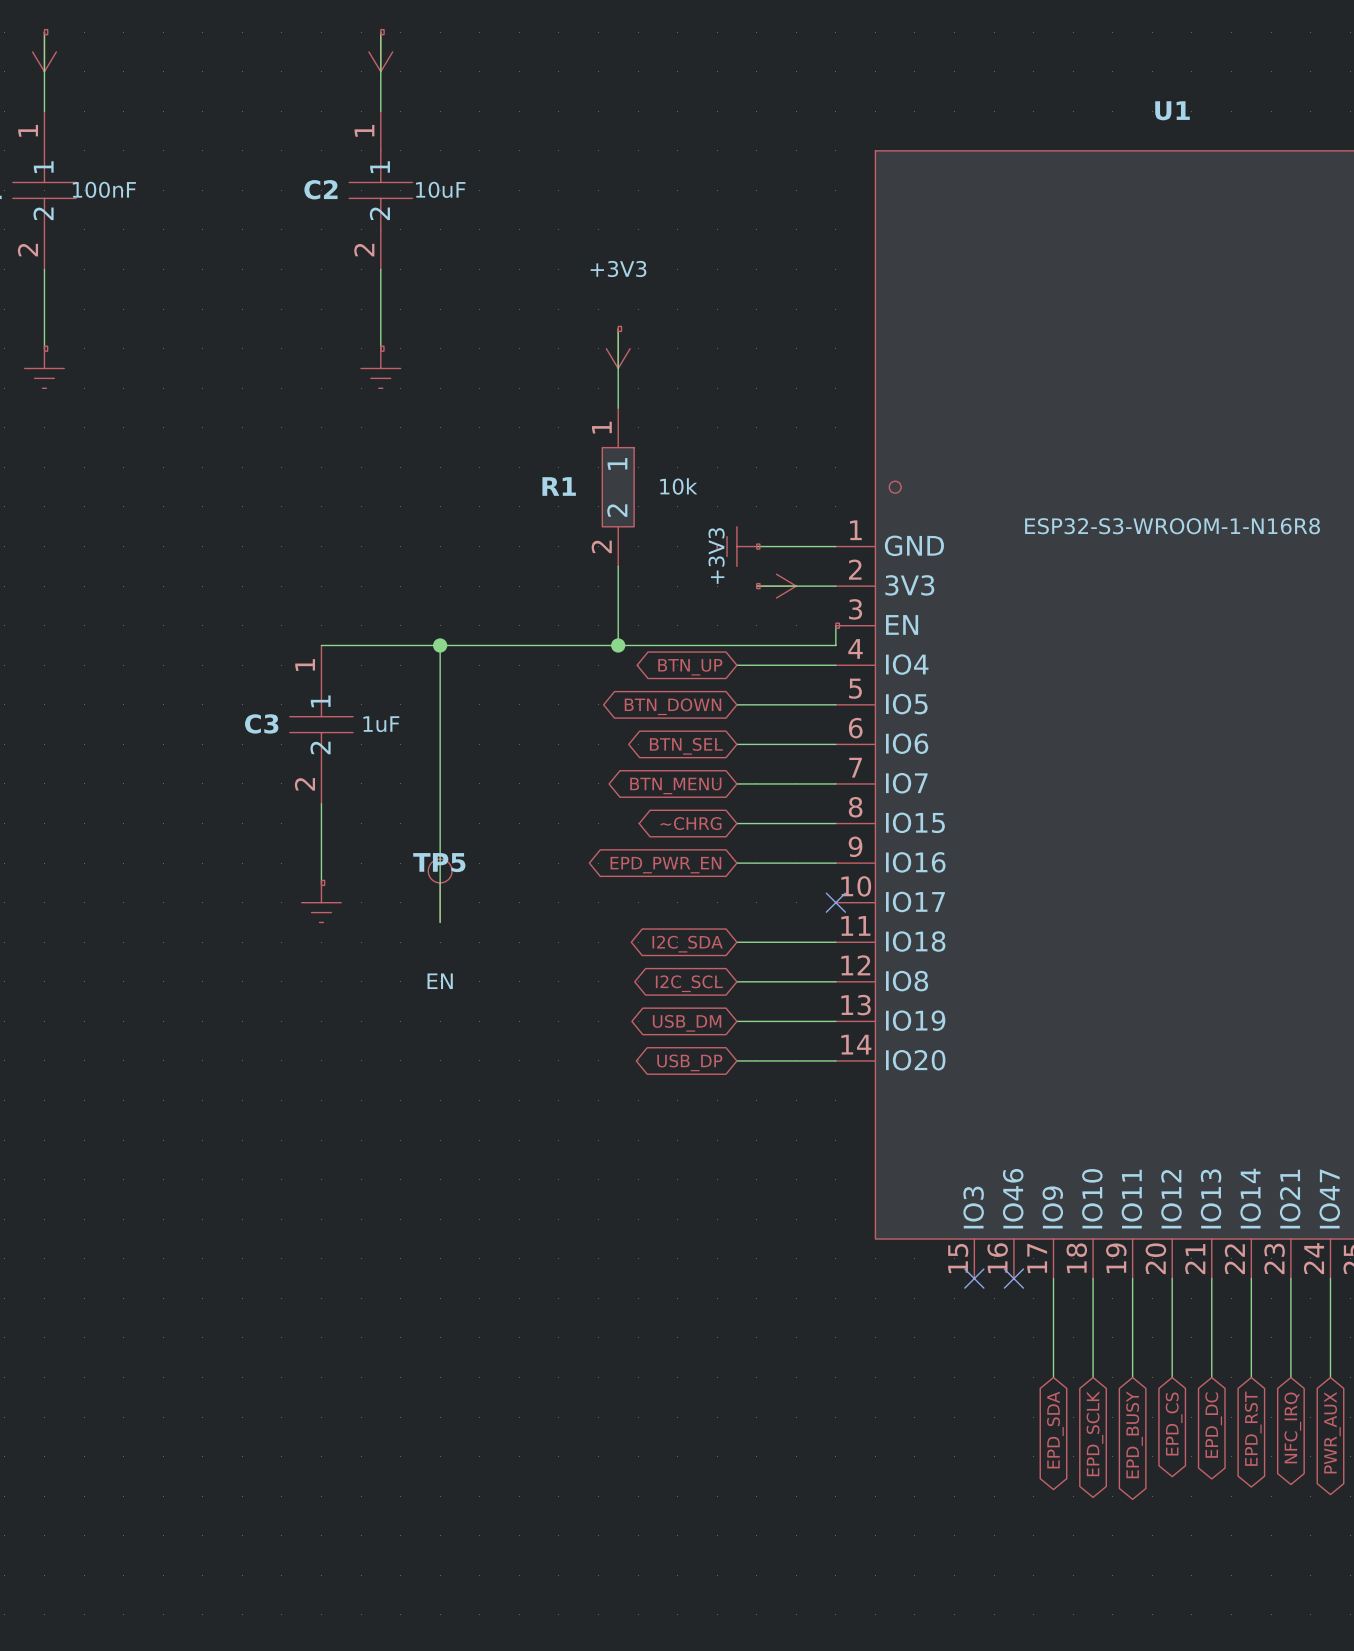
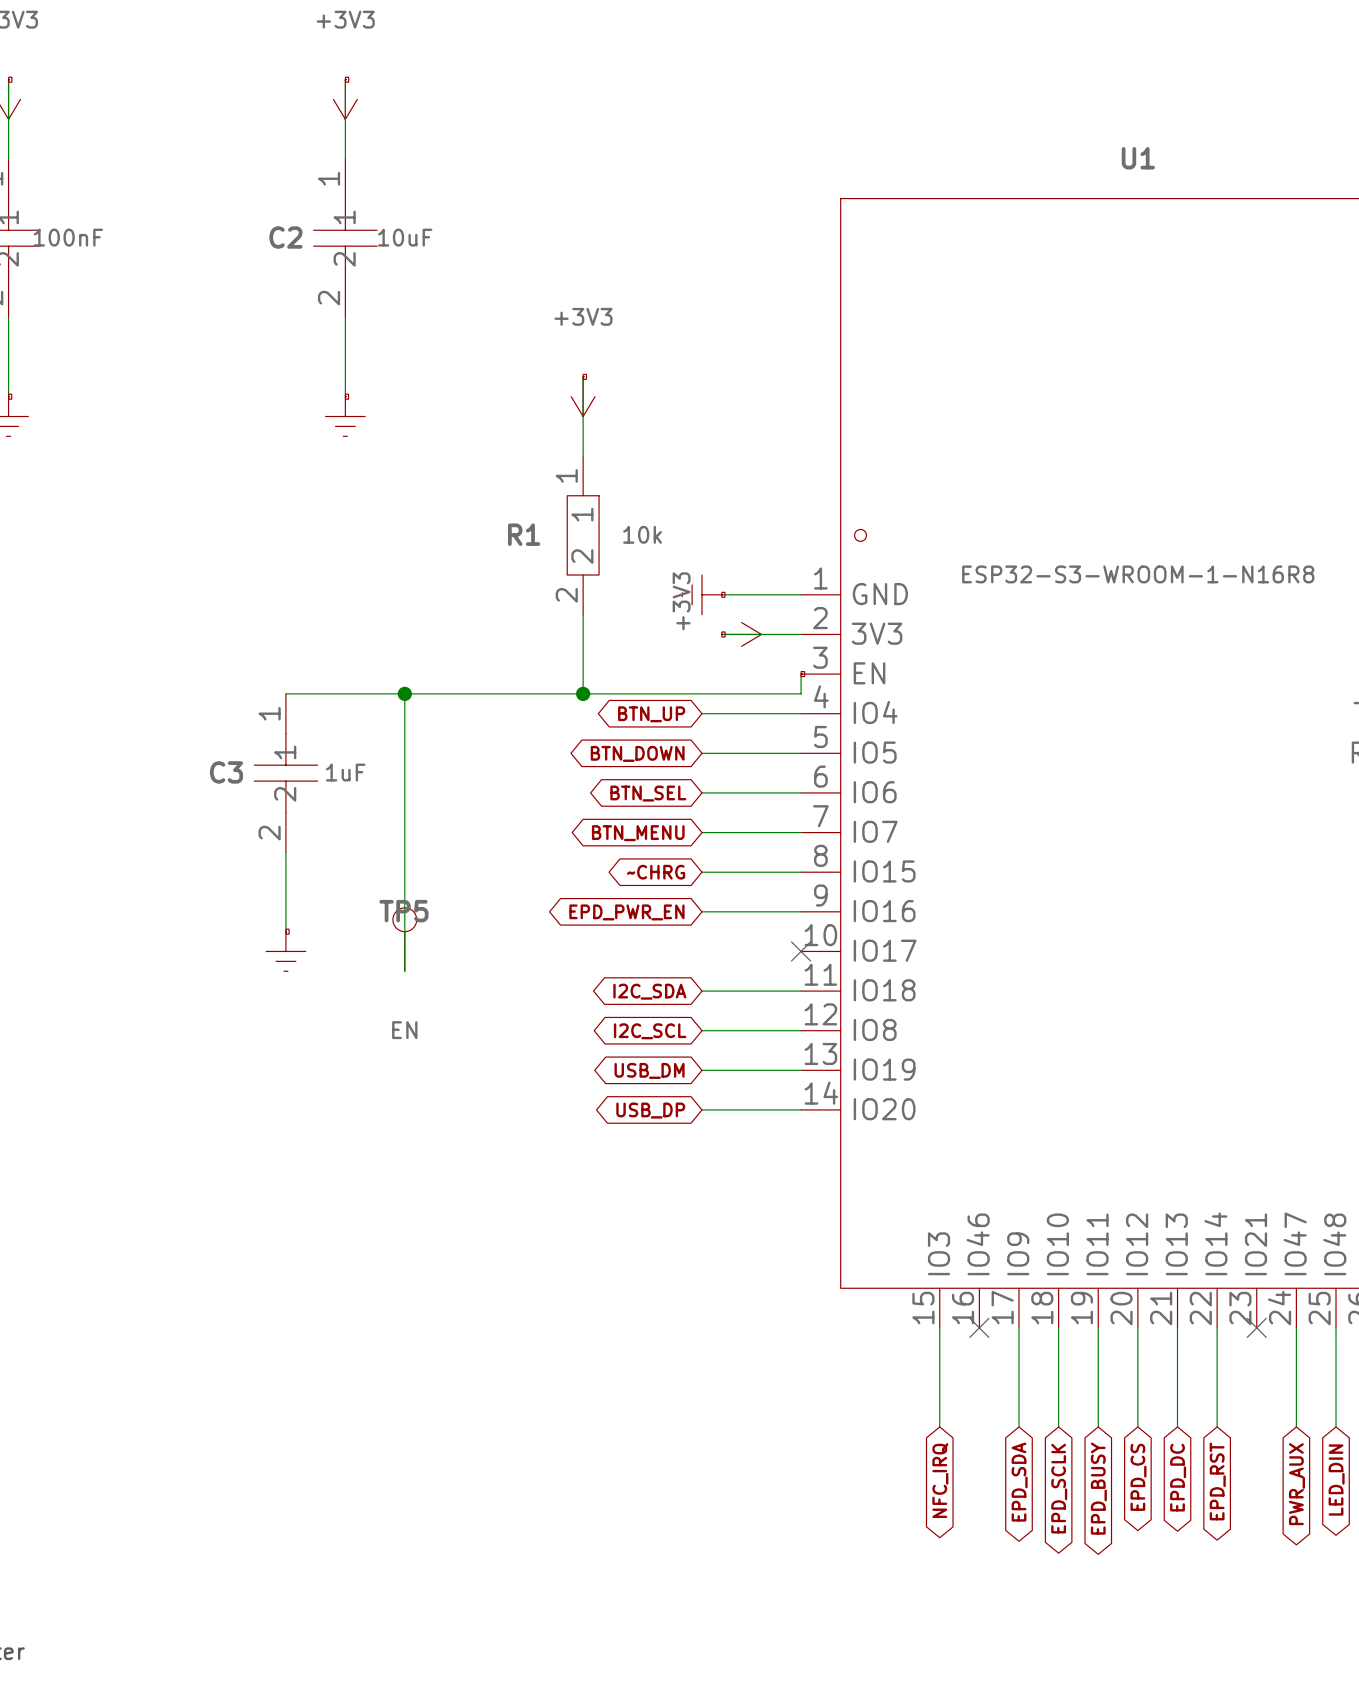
no-connect mark: (974, 1278) -> none
wire: (1290, 1278) (1290, 1377) -> (939, 1327) (939, 1426)
no-connect mark: none -> (1256, 1327)
global label position: NFC_IRQ (1292, 1427) -> NFC_IRQ (940, 1480)

